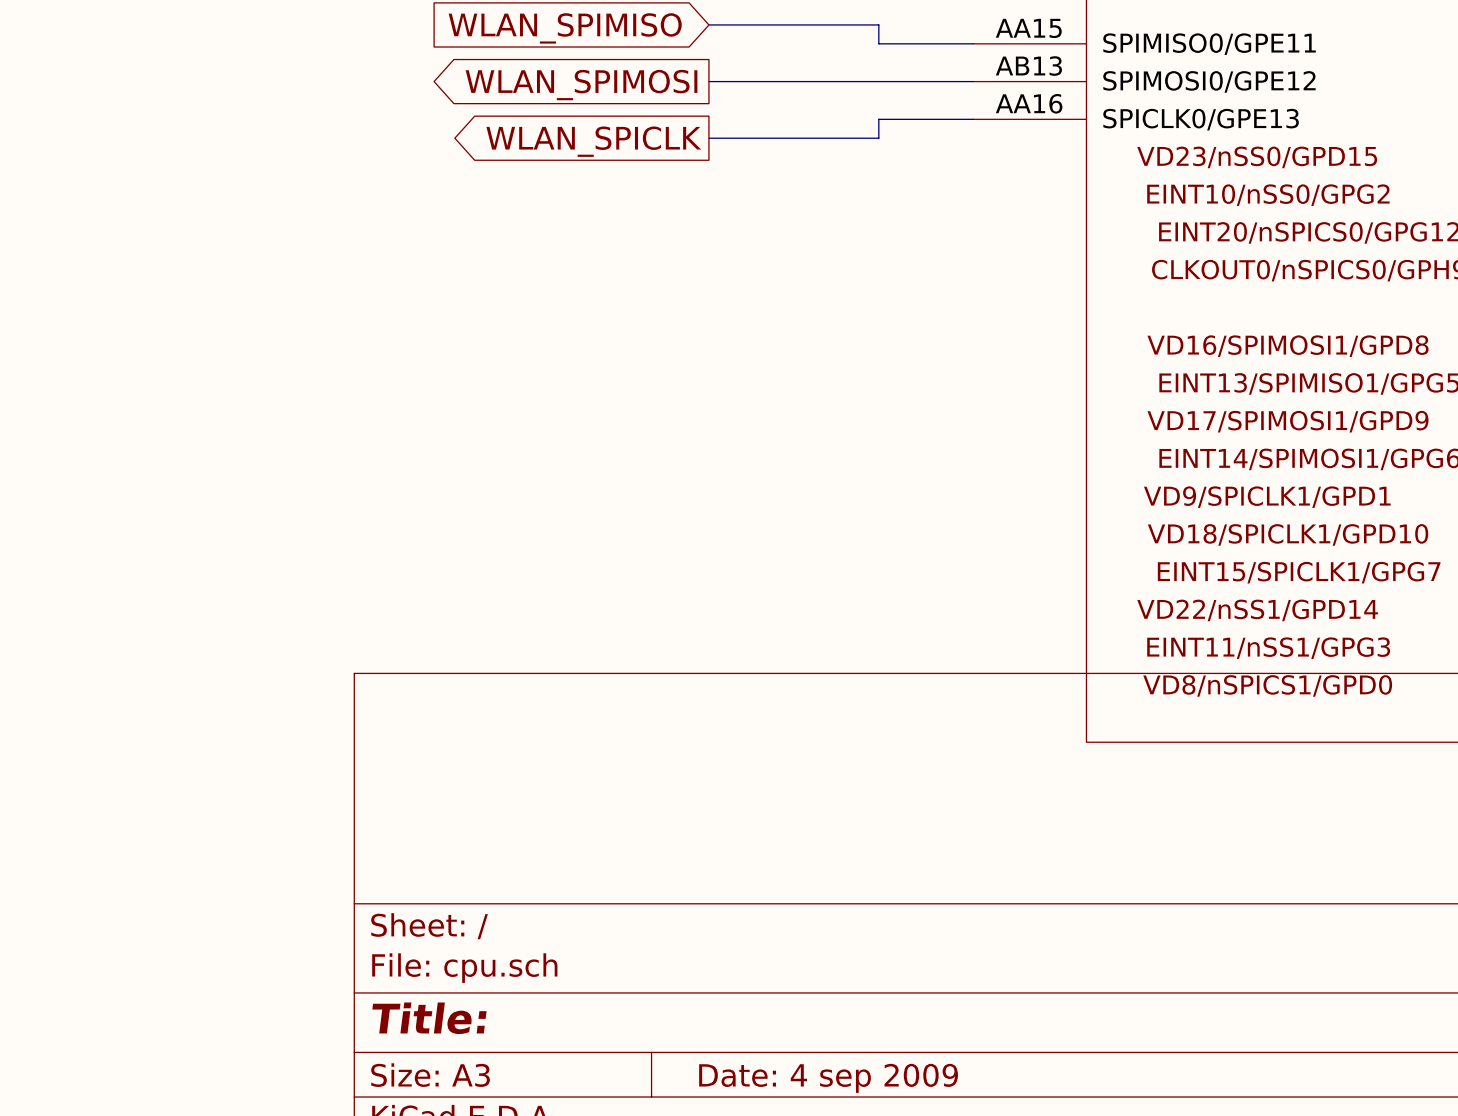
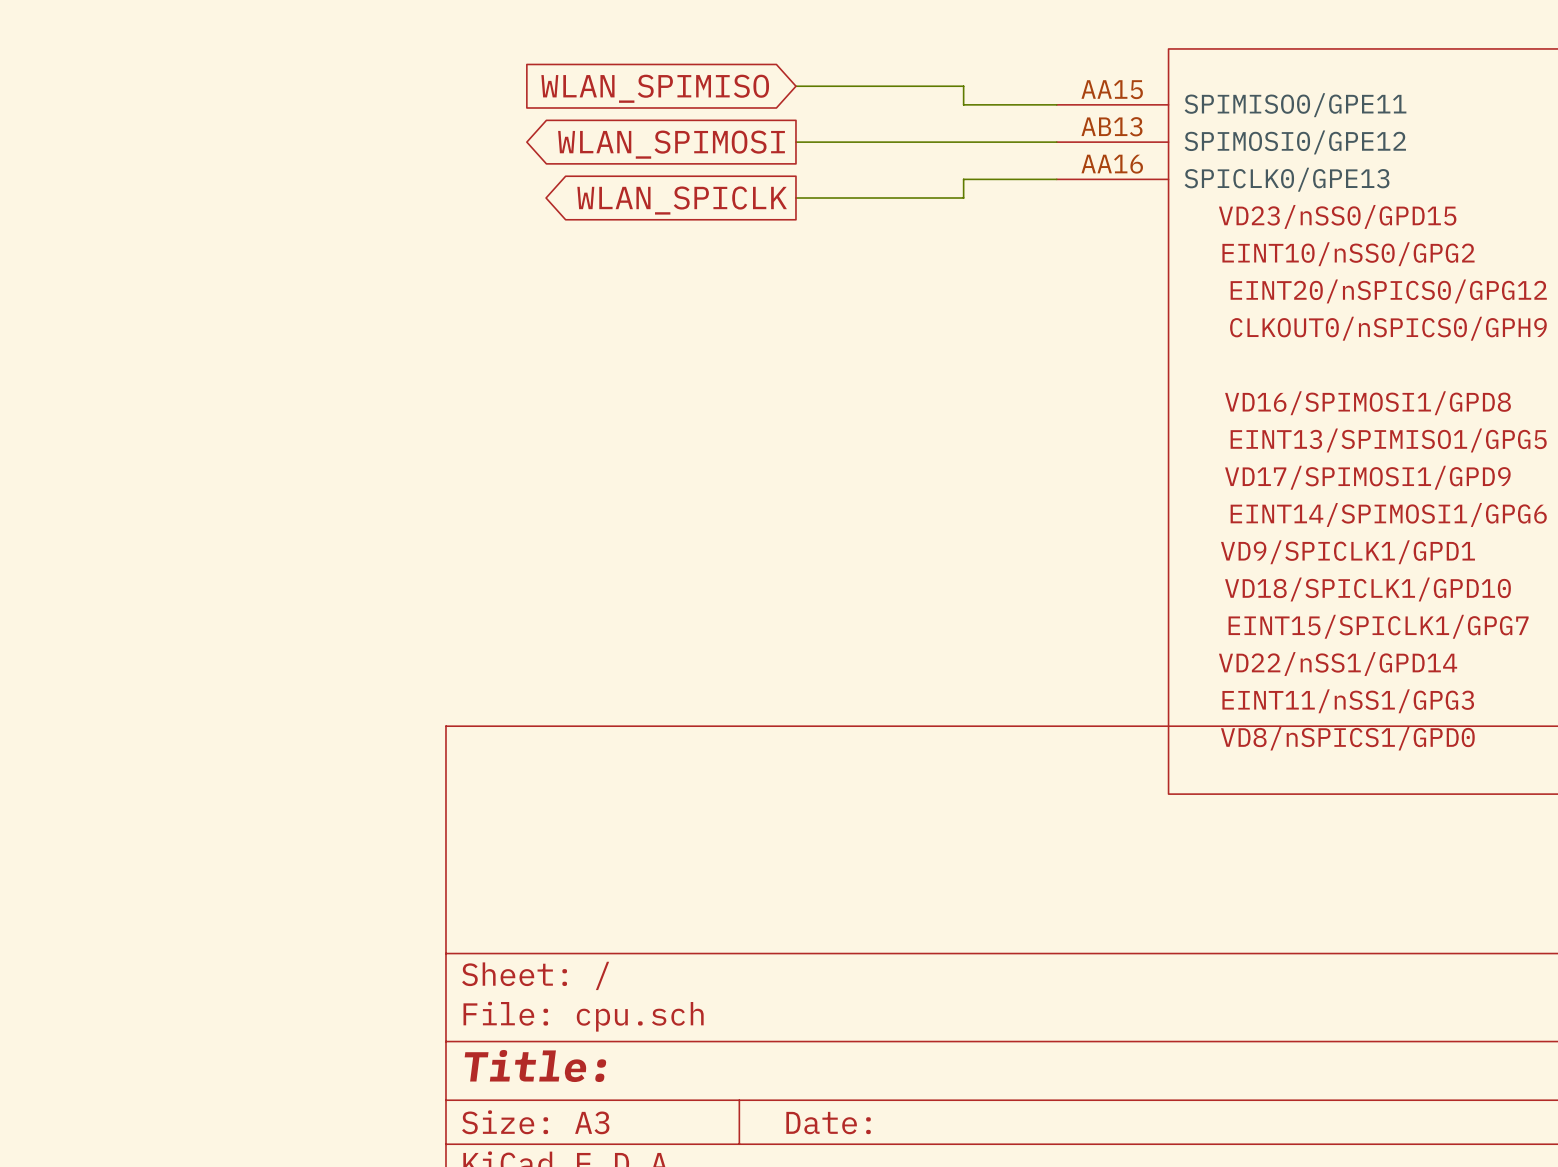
title block: Date: 4 sep 2009 (828, 1078) -> Date: (828, 1123)

